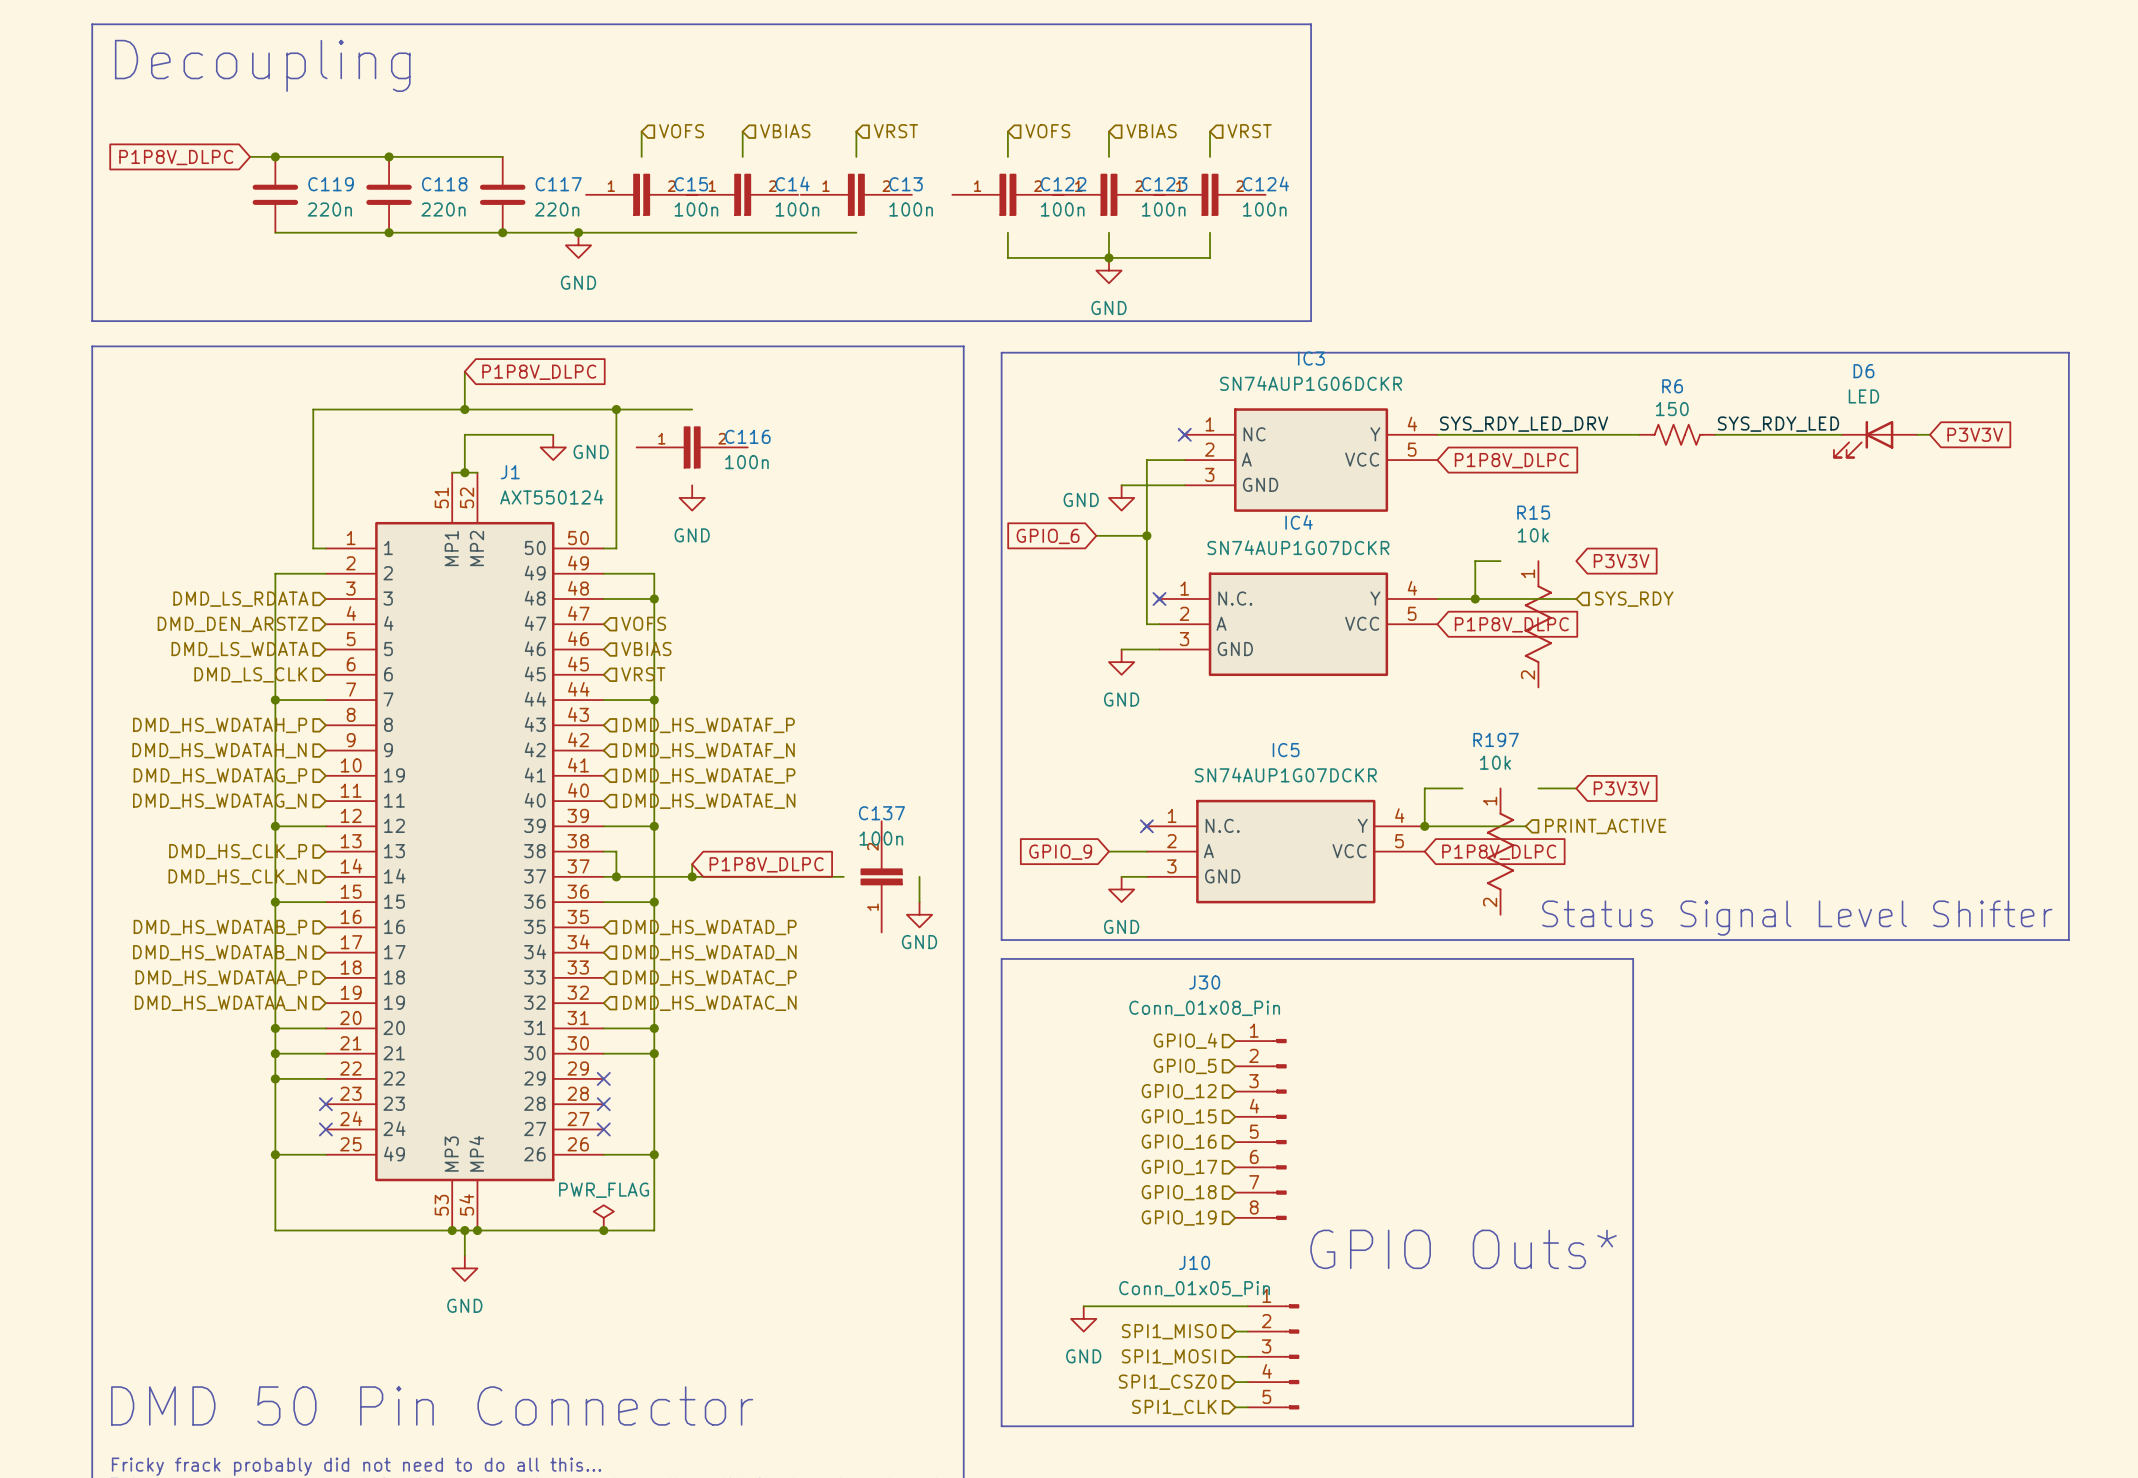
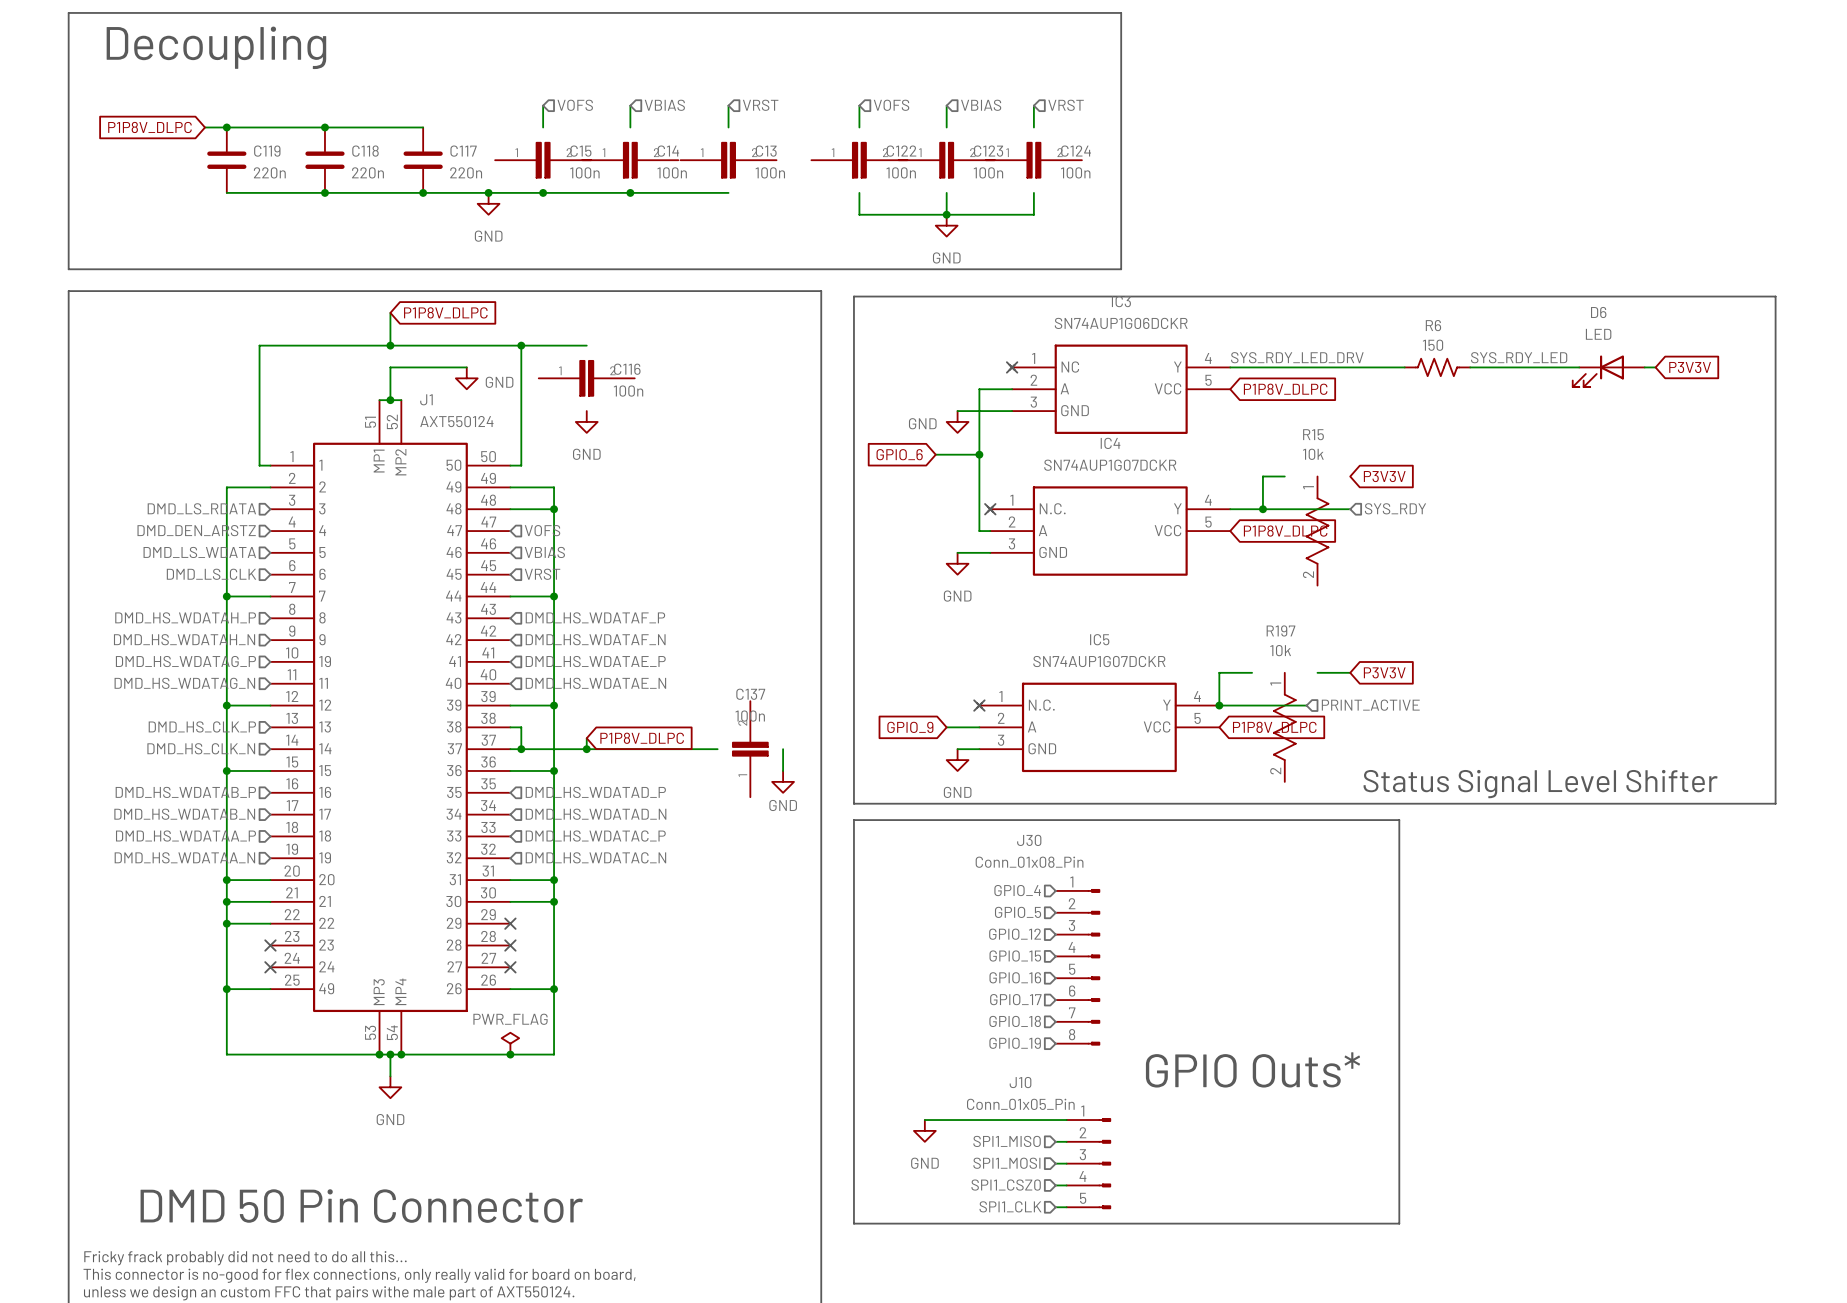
junction: none -> (543, 192)
junction: none -> (630, 192)

